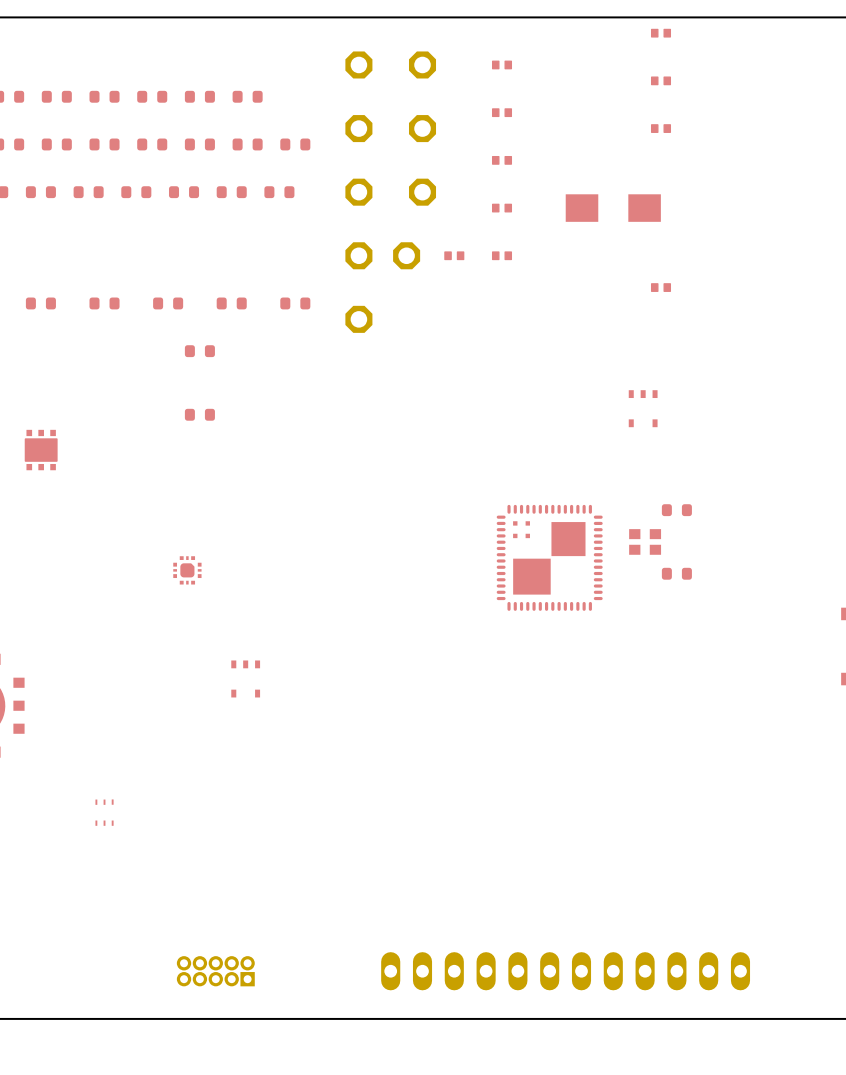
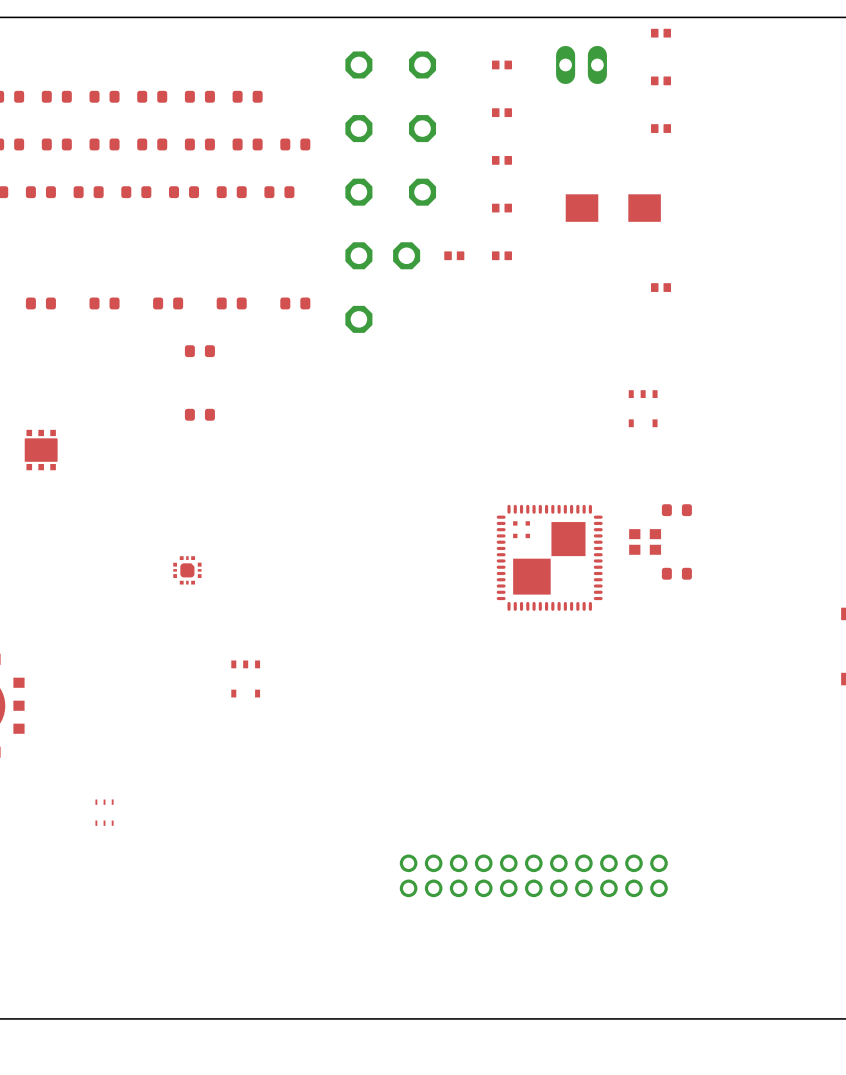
part: none -> (581, 64)
part: none -> (533, 875)
part: (215, 971) -> none
part: (565, 971) -> none

